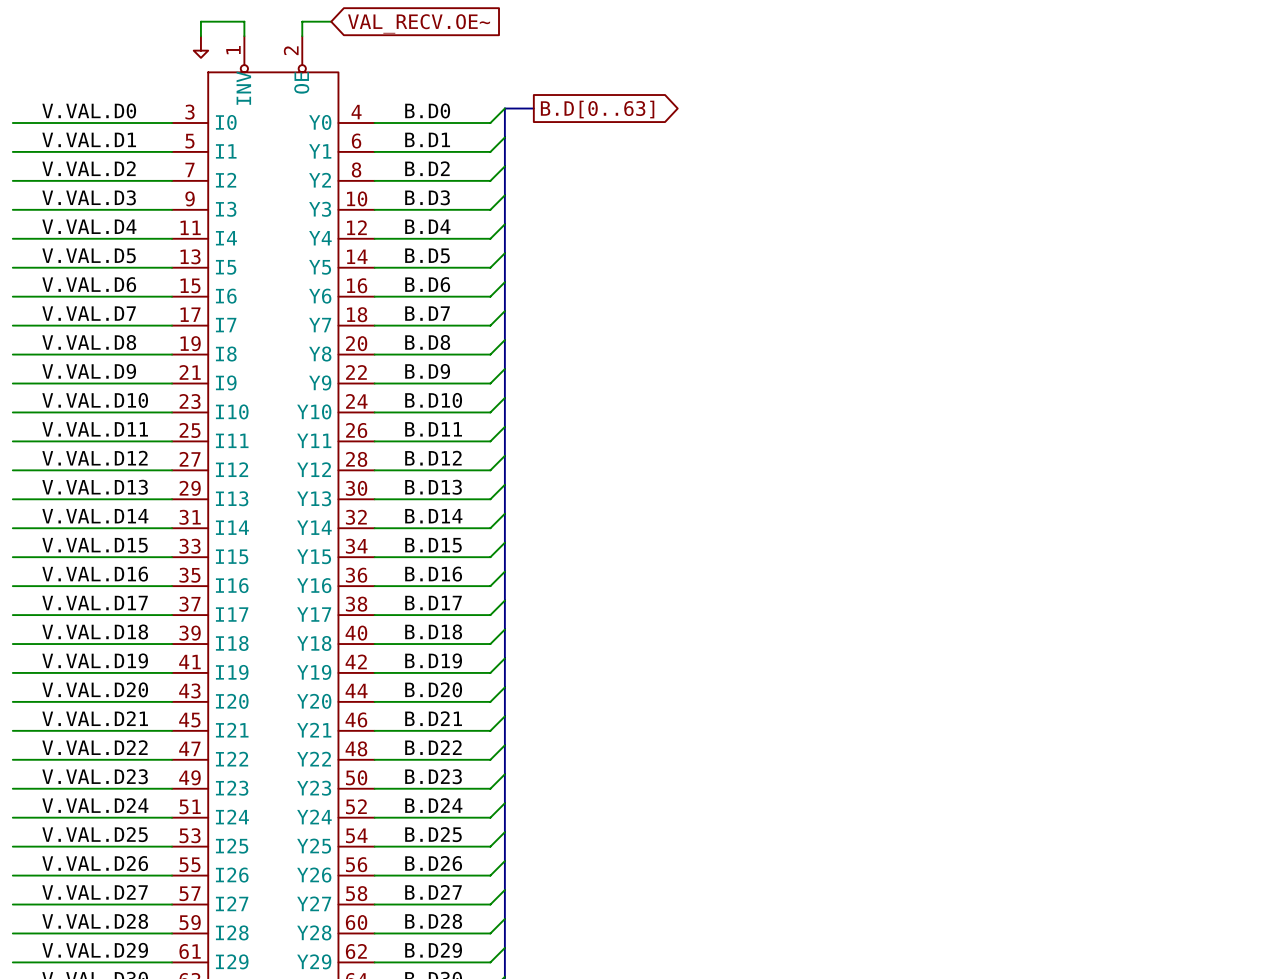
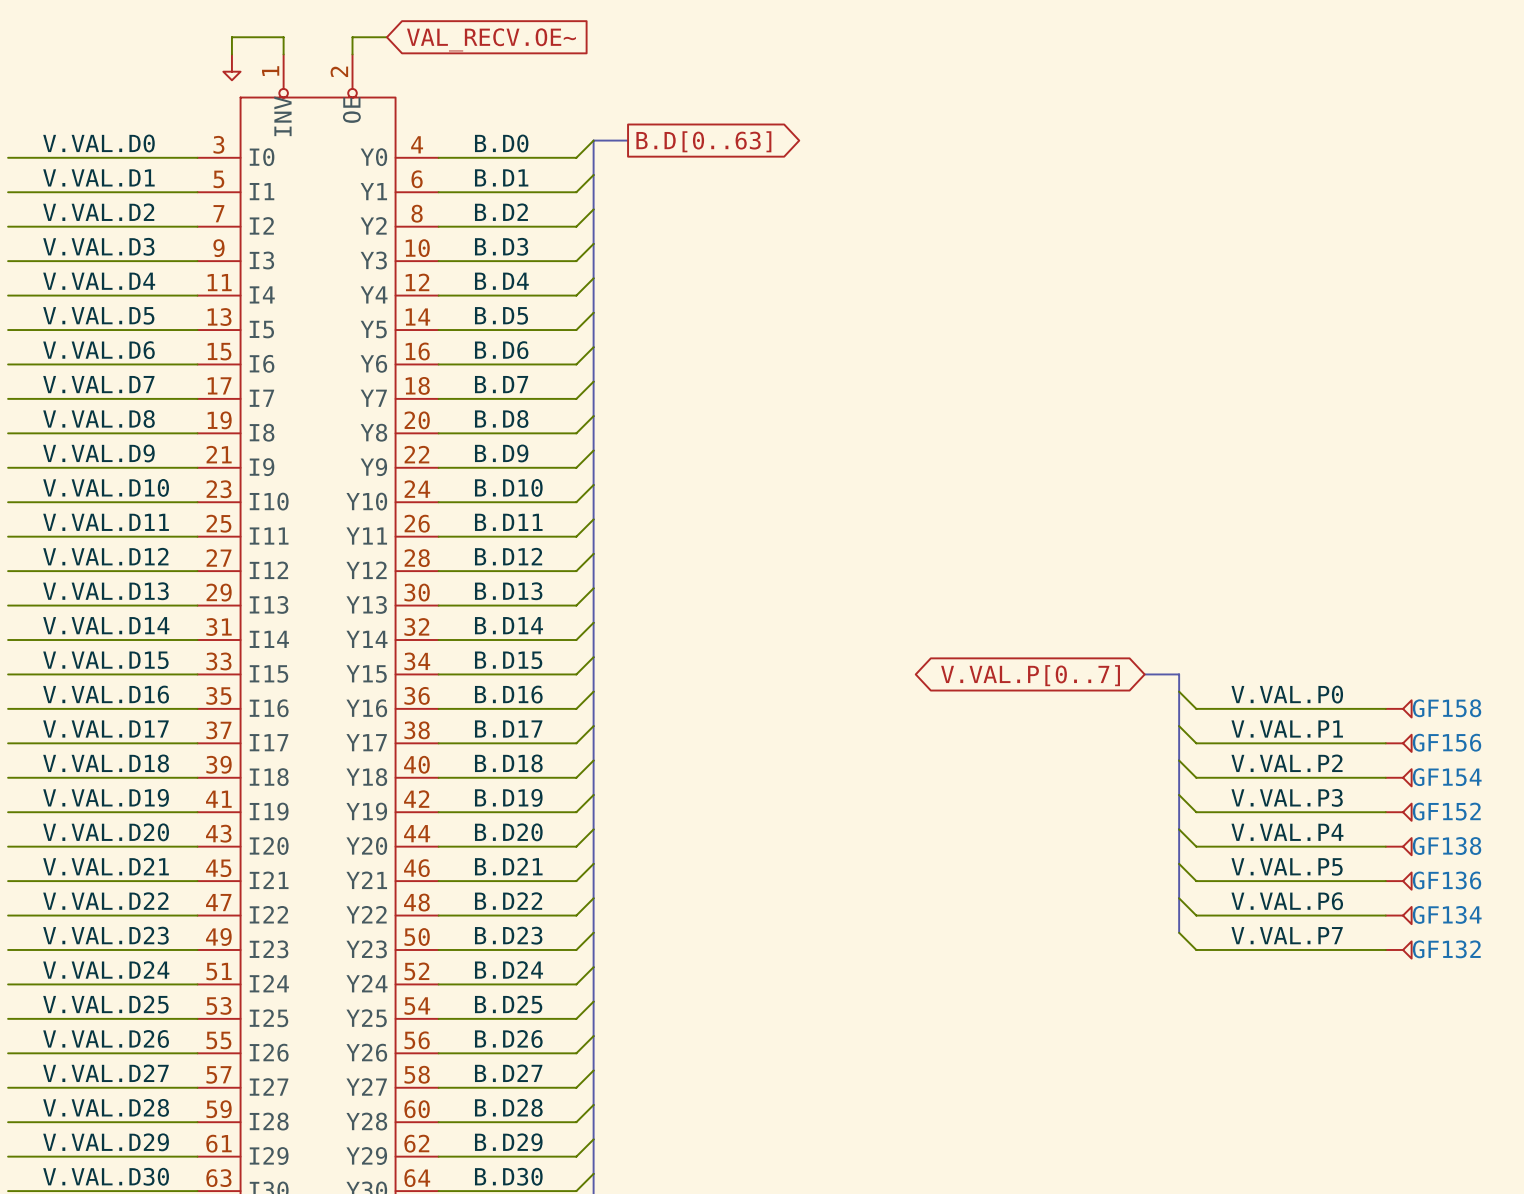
bus: none -> (1144, 674) (1179, 674) (1179, 932)
global label: none -> V.VAL.P[0..7] (1030, 675)
wire: none -> (1179, 691) (1196, 708) (1385, 708)
label: none -> V.VAL.P0 (1287, 694)
GF158: none -> (1398, 708)
wire: none -> (1179, 726) (1196, 743) (1385, 743)
label: none -> V.VAL.P1 (1287, 728)
GF156: none -> (1398, 743)
wire: none -> (1179, 760) (1196, 777) (1385, 777)
label: none -> V.VAL.P2 (1287, 763)
GF154: none -> (1398, 777)
wire: none -> (1179, 794) (1196, 812) (1385, 812)
label: none -> V.VAL.P3 (1287, 797)
GF152: none -> (1398, 812)
wire: none -> (1179, 829) (1196, 846) (1385, 846)
label: none -> V.VAL.P4 (1287, 832)
GF138: none -> (1398, 846)
wire: none -> (1179, 863) (1196, 881) (1385, 881)
label: none -> V.VAL.P5 (1287, 866)
GF136: none -> (1398, 881)
wire: none -> (1179, 898) (1196, 915) (1385, 915)
label: none -> V.VAL.P6 (1287, 901)
GF134: none -> (1398, 915)
wire: none -> (1179, 932) (1196, 949) (1385, 949)
label: none -> V.VAL.P7 (1287, 935)
GF132: none -> (1398, 949)

